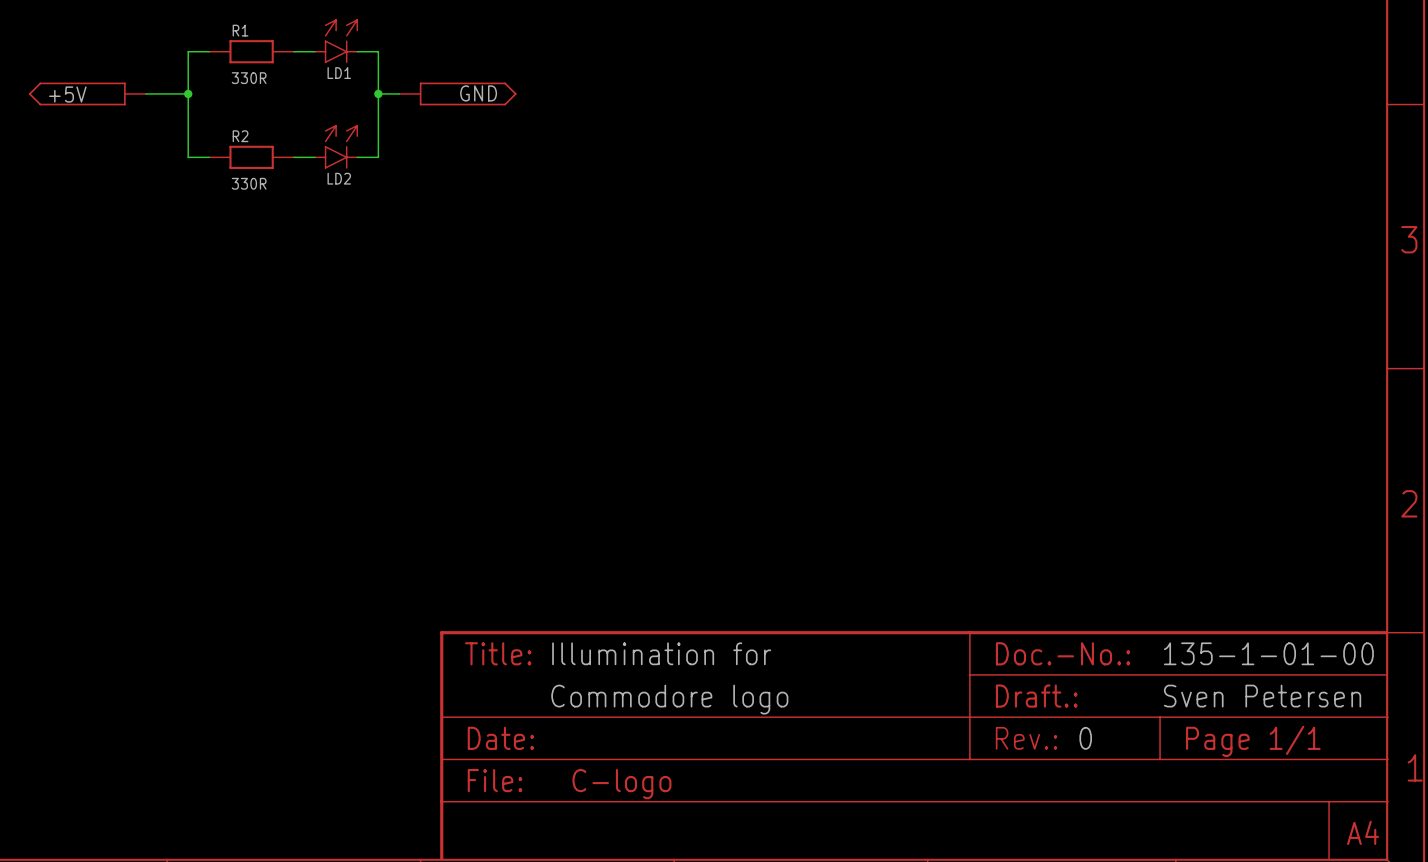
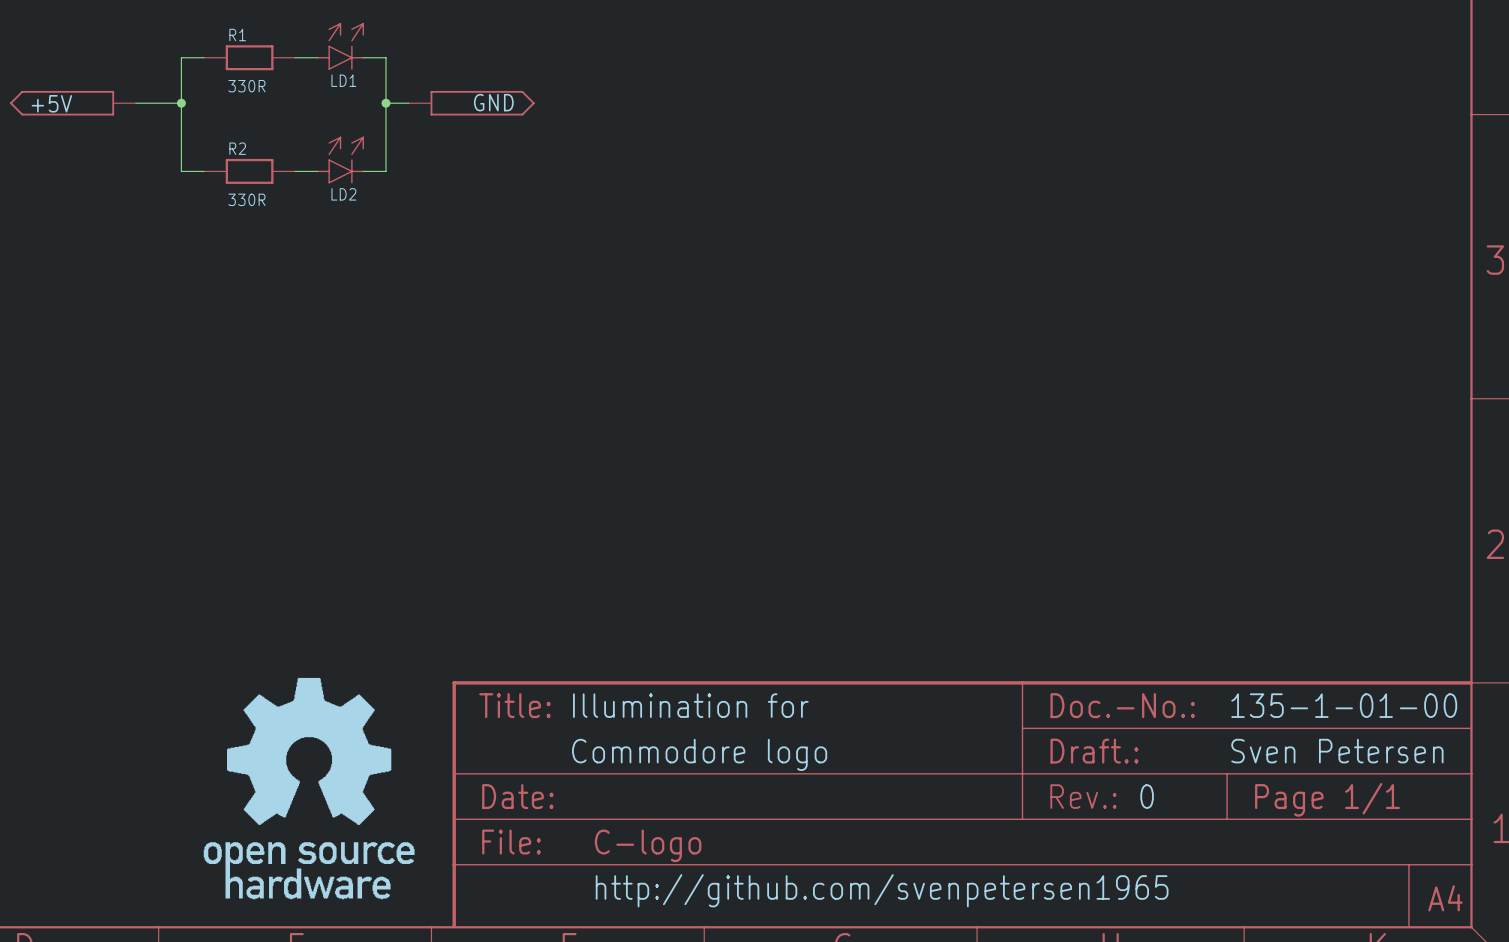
part: none -> (309, 788)
text: none -> http://github.com/svenpetersen1965 (882, 890)

